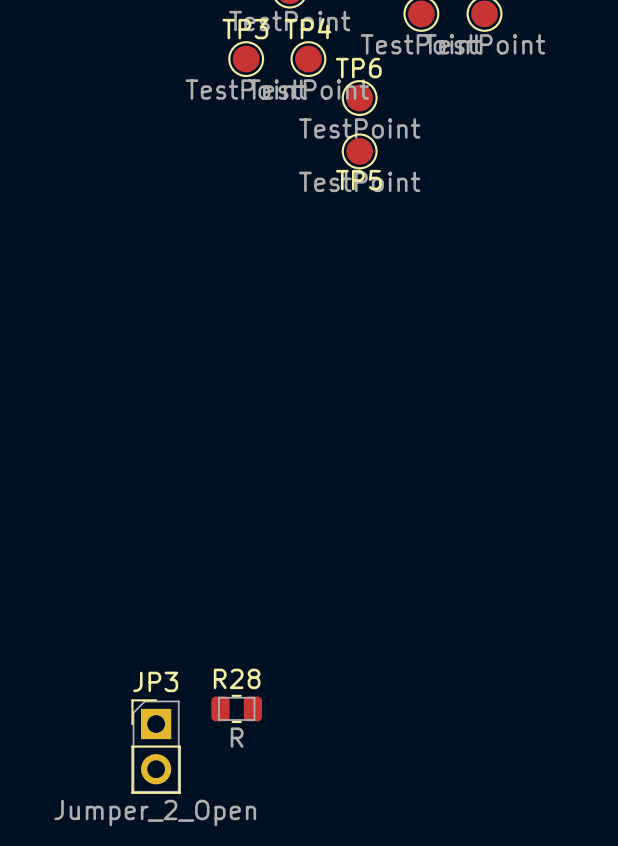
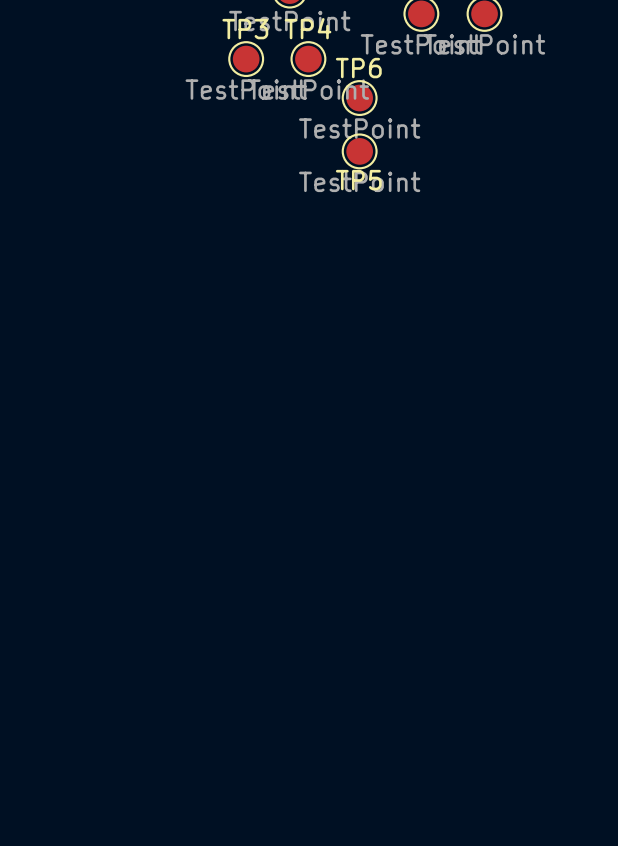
R28: R (236, 708) -> none
JP3: Jumper_2_Open (156, 746) -> none

